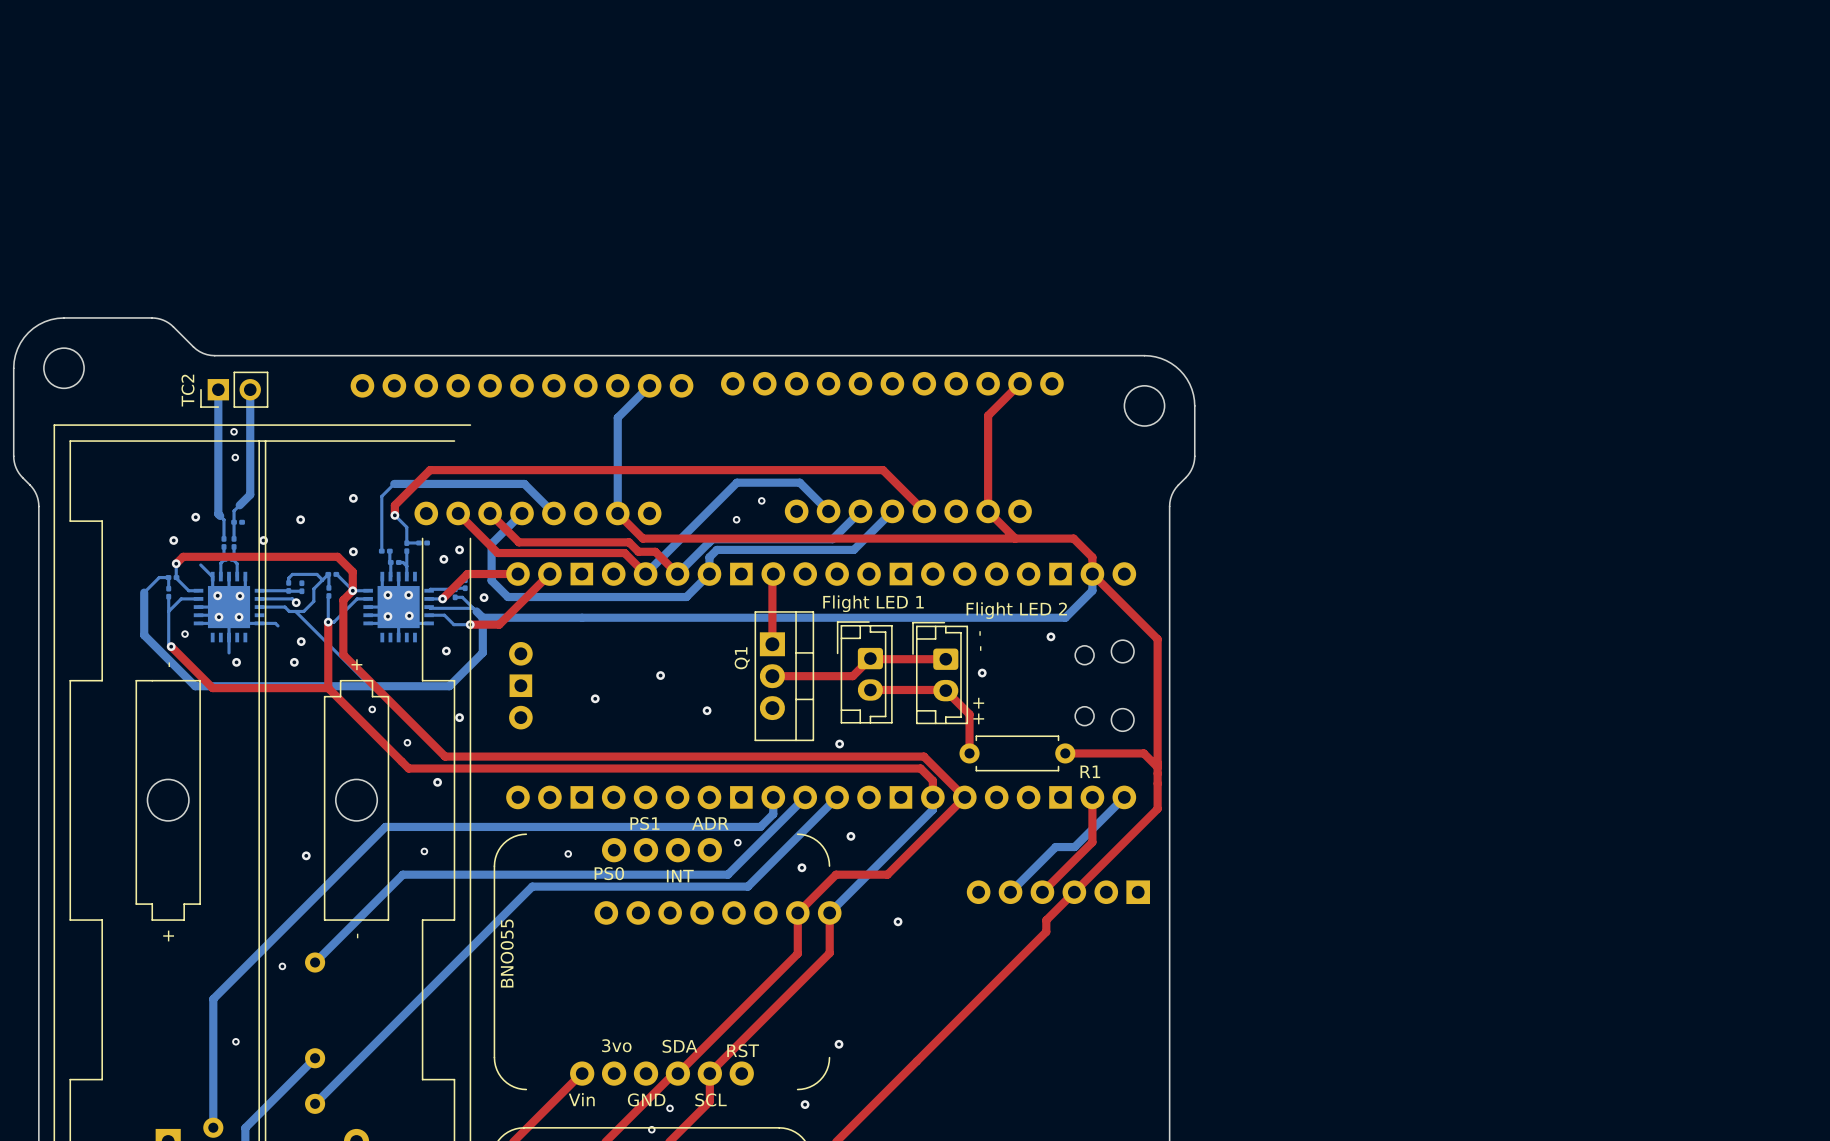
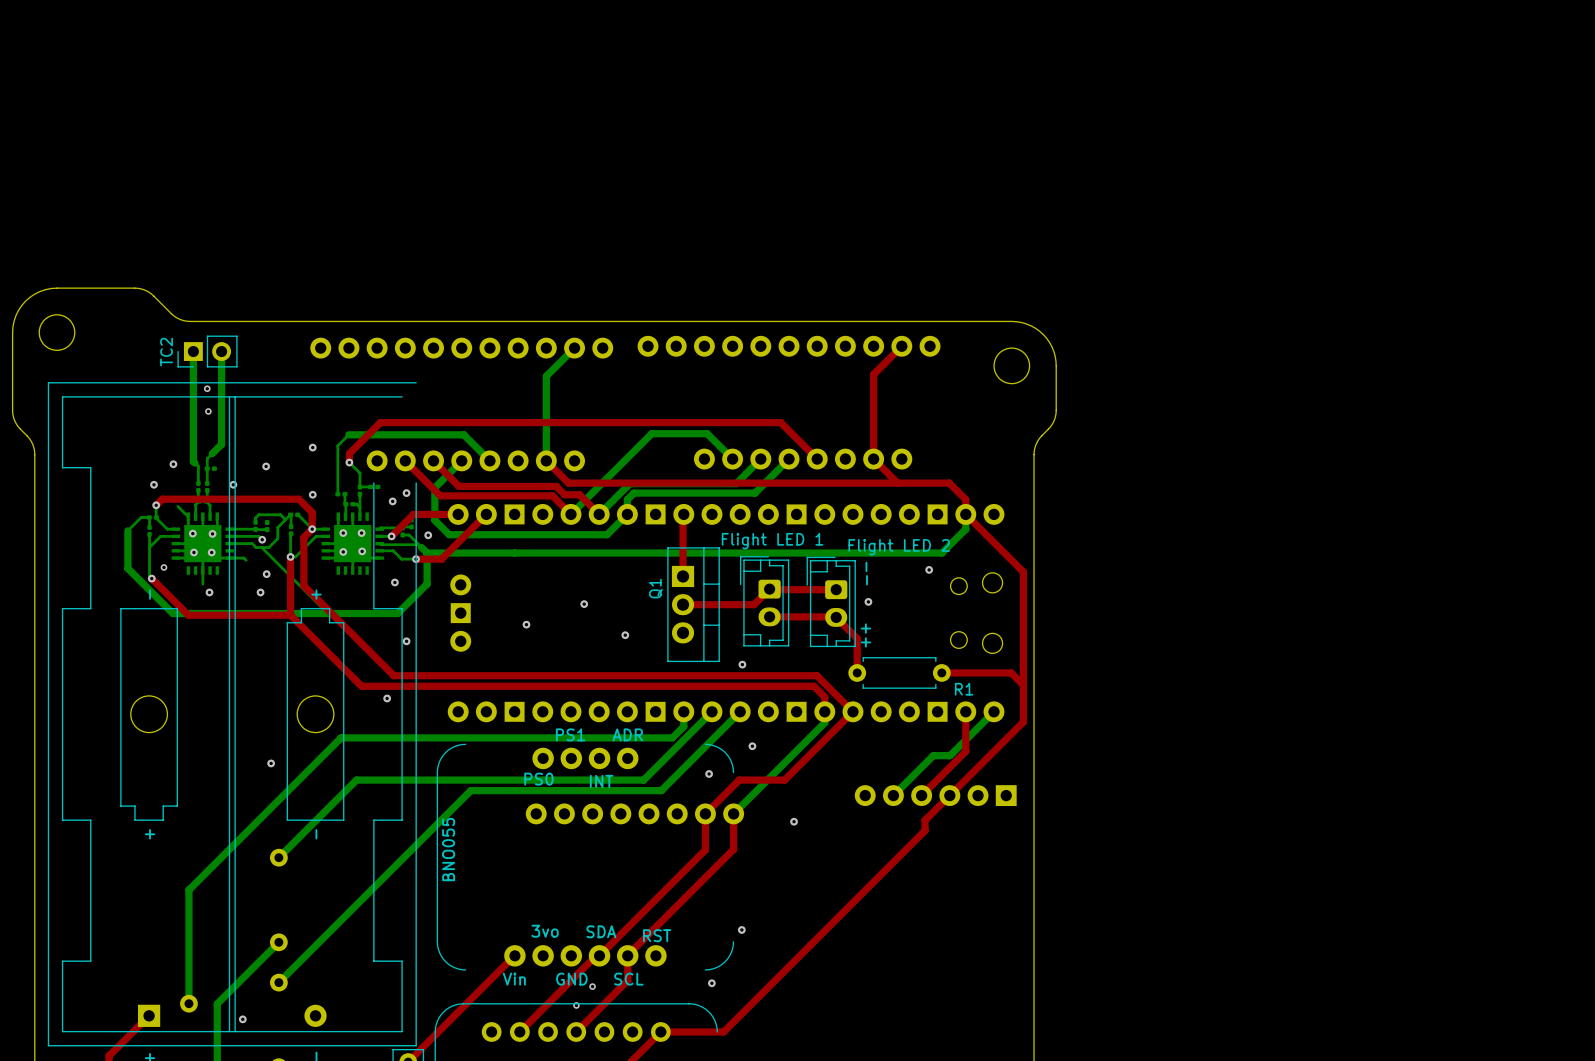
via: (761, 500) -> none
via: (736, 519) -> none
via: (372, 709) -> none
via: (407, 742) -> none
via: (737, 842) -> none
via: (424, 851) -> none
via: (568, 853) -> none
via: (282, 966) -> none
via: (235, 1041) -> none

